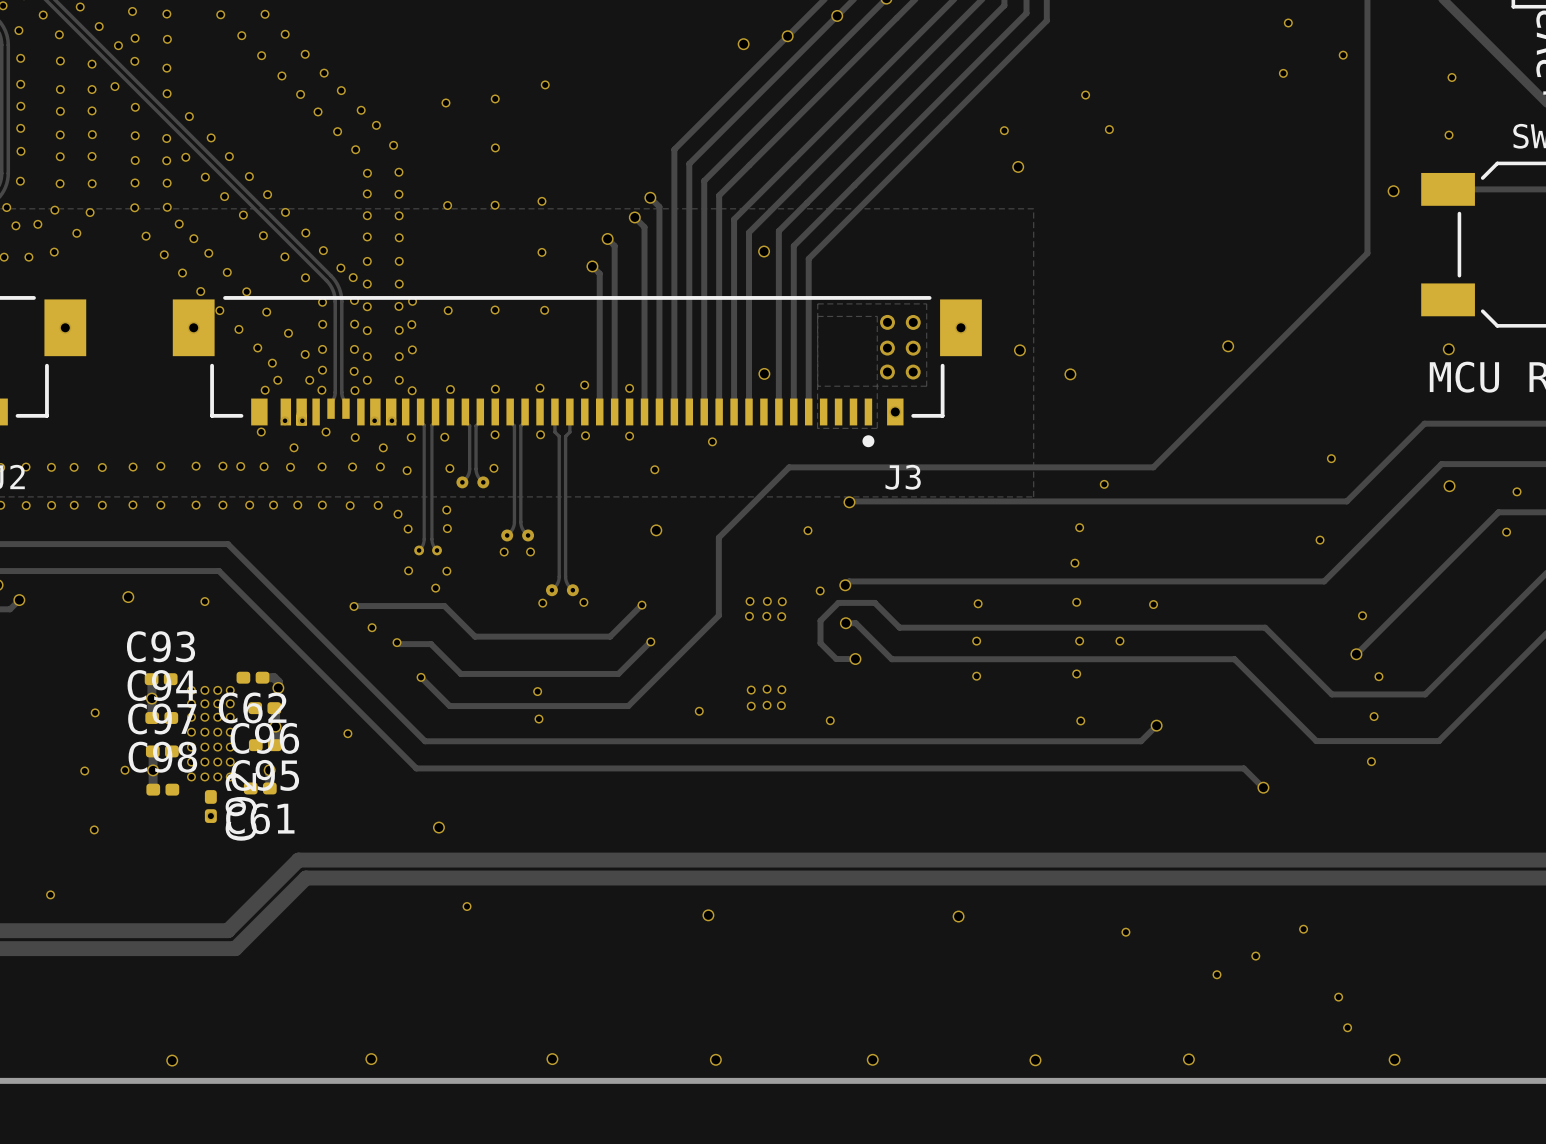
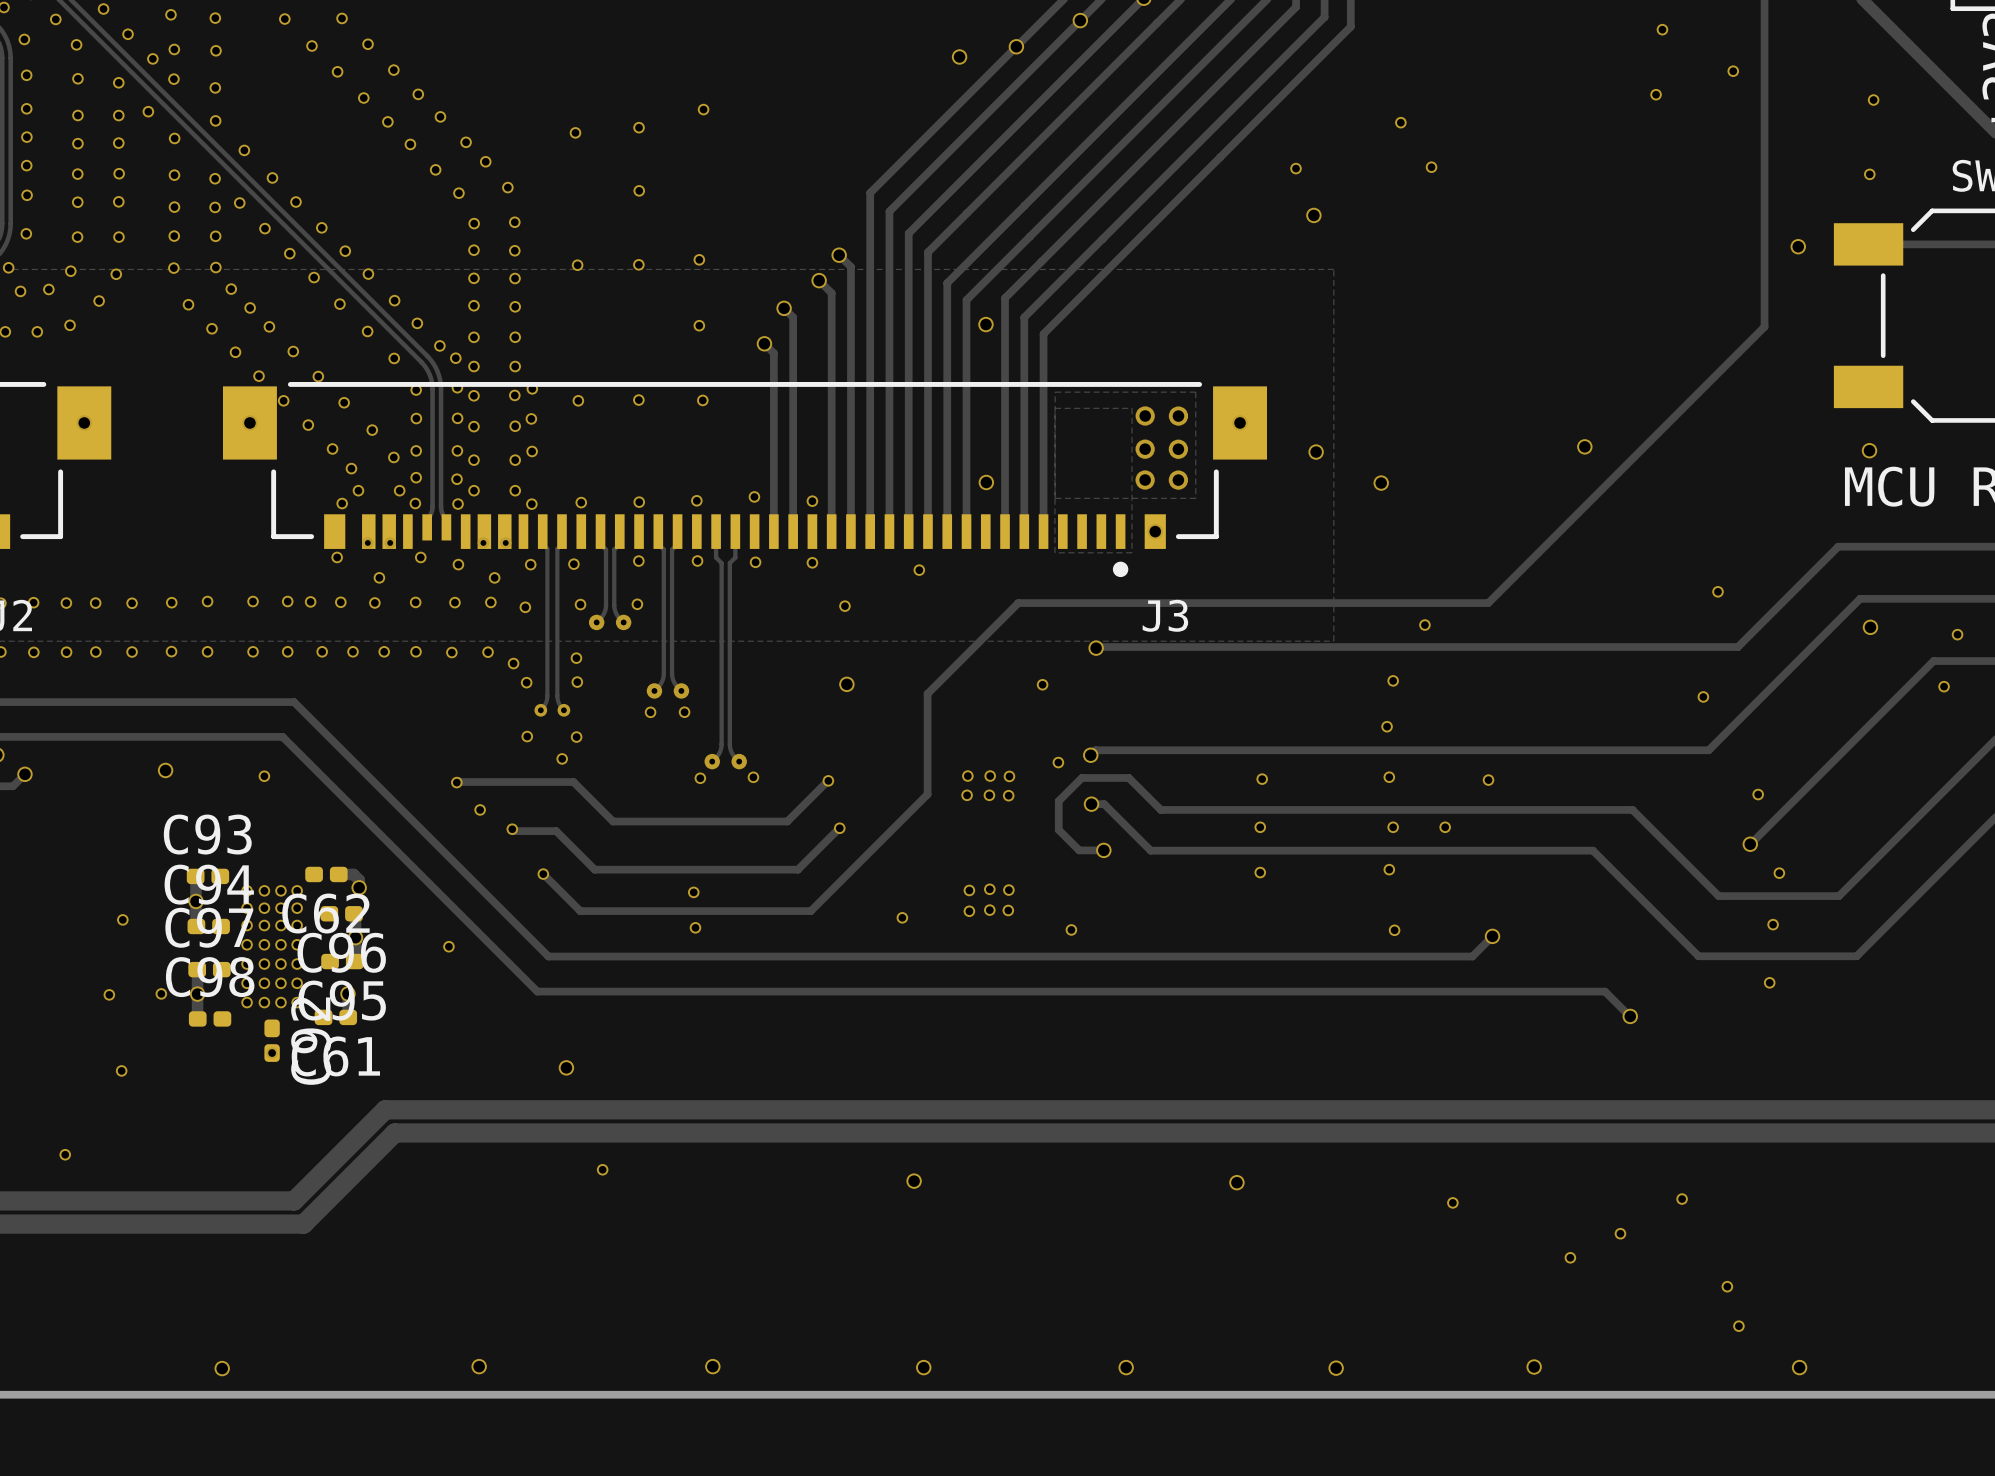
J3 footprint: [172, 296, 982, 448] -> [222, 382, 1267, 578]

